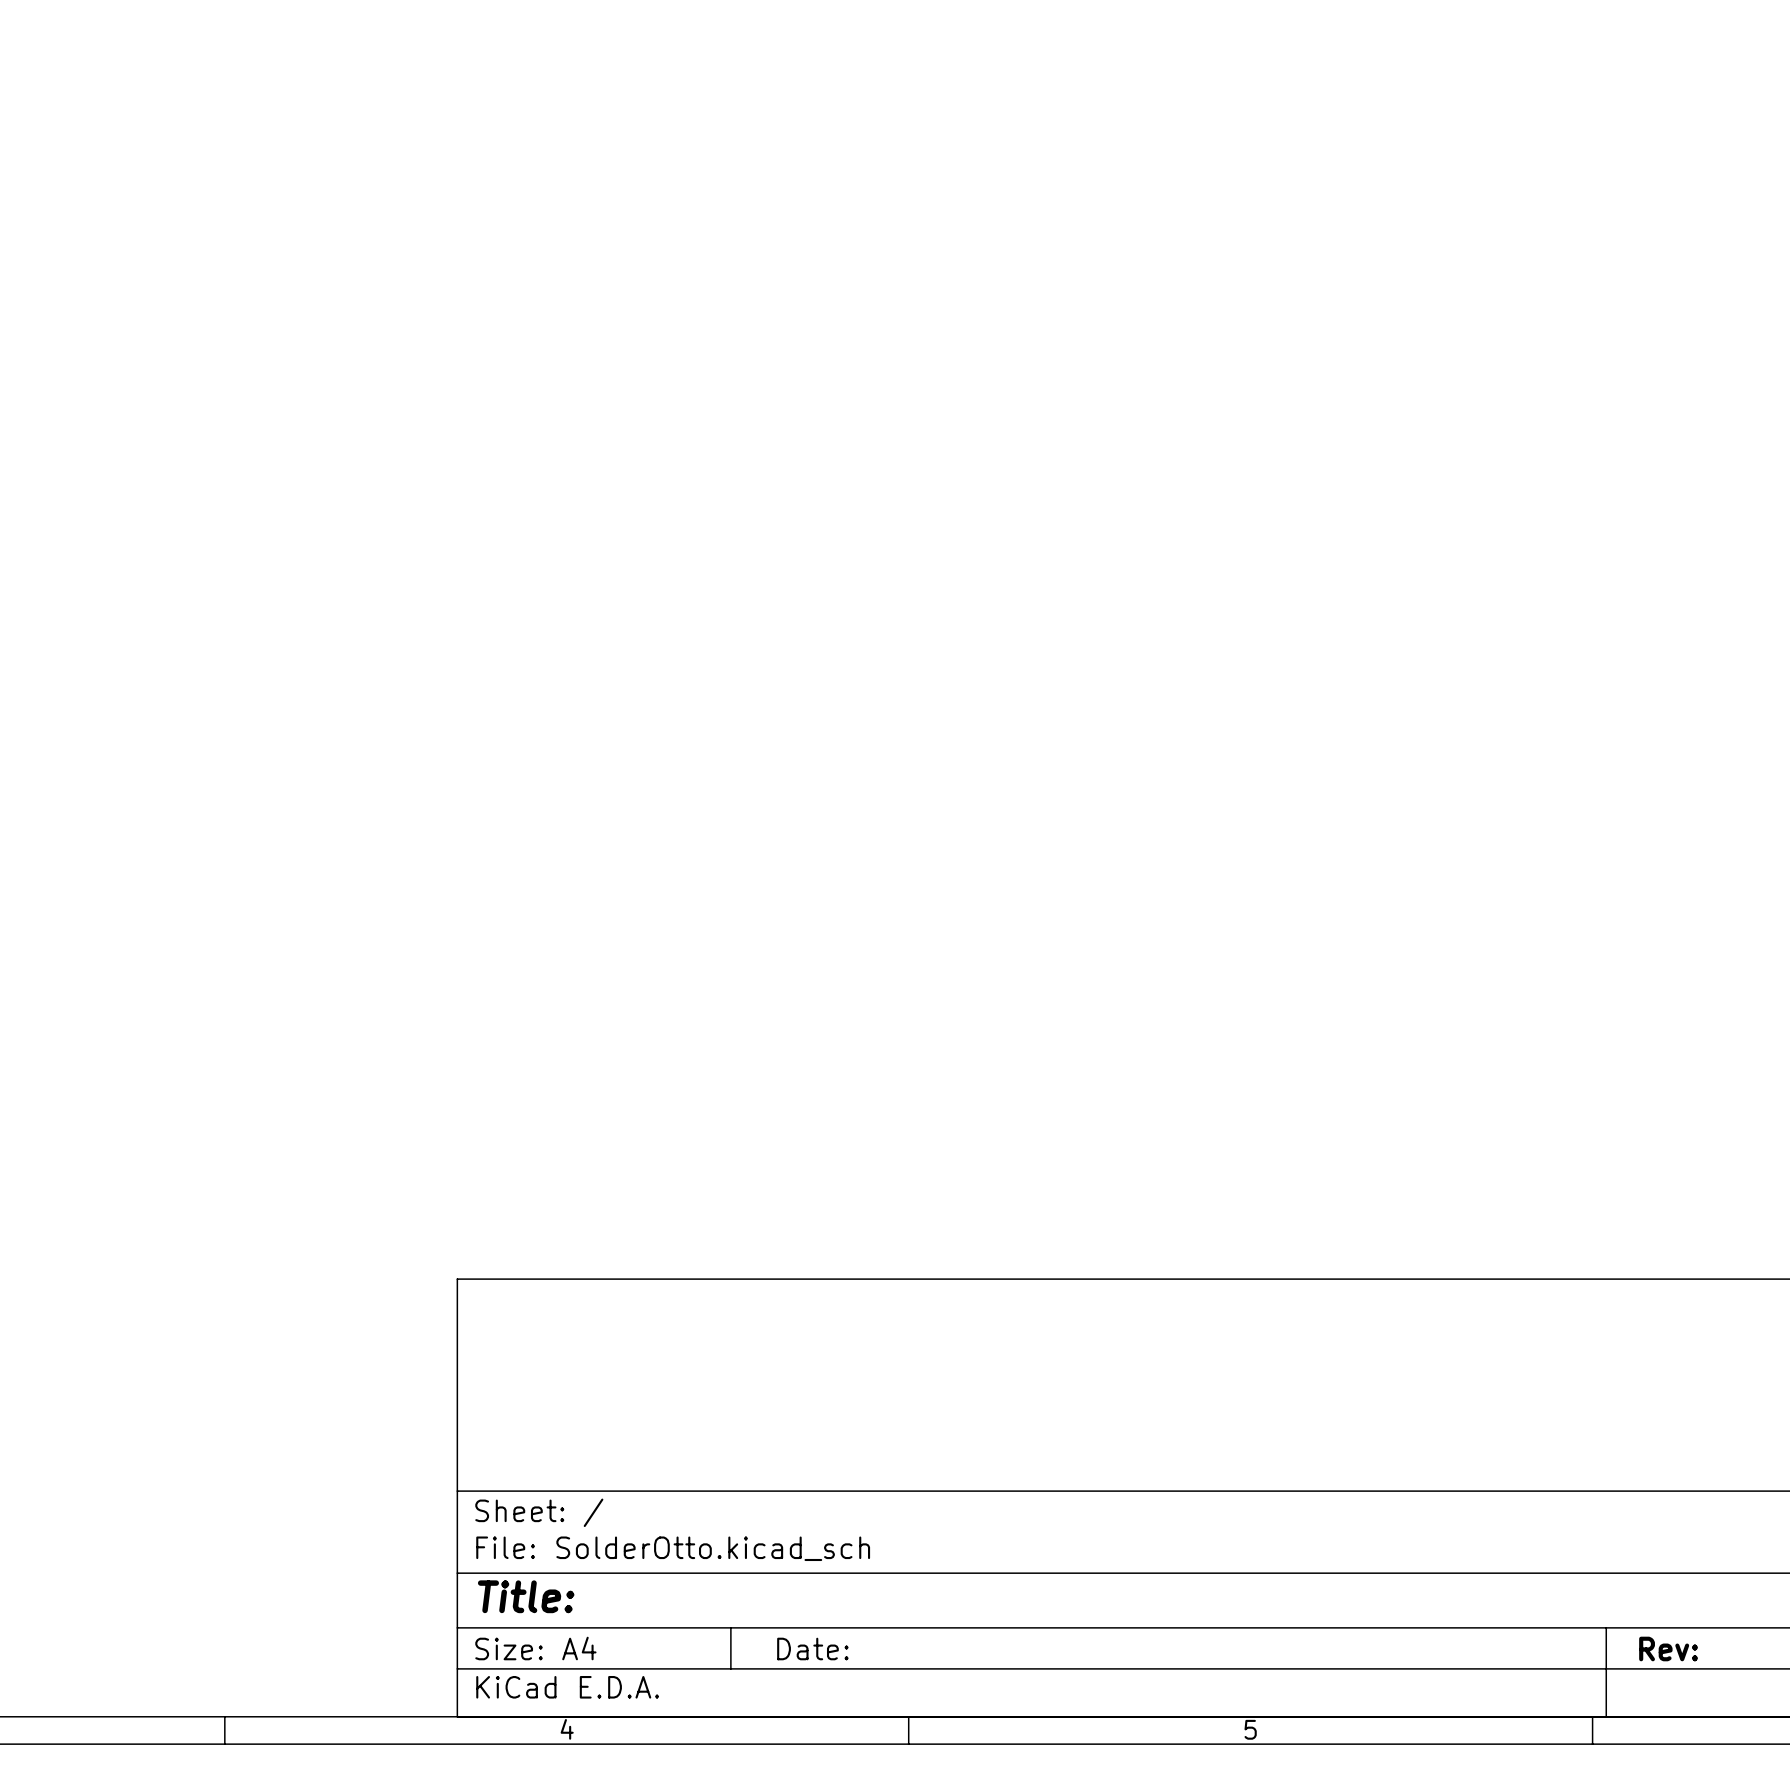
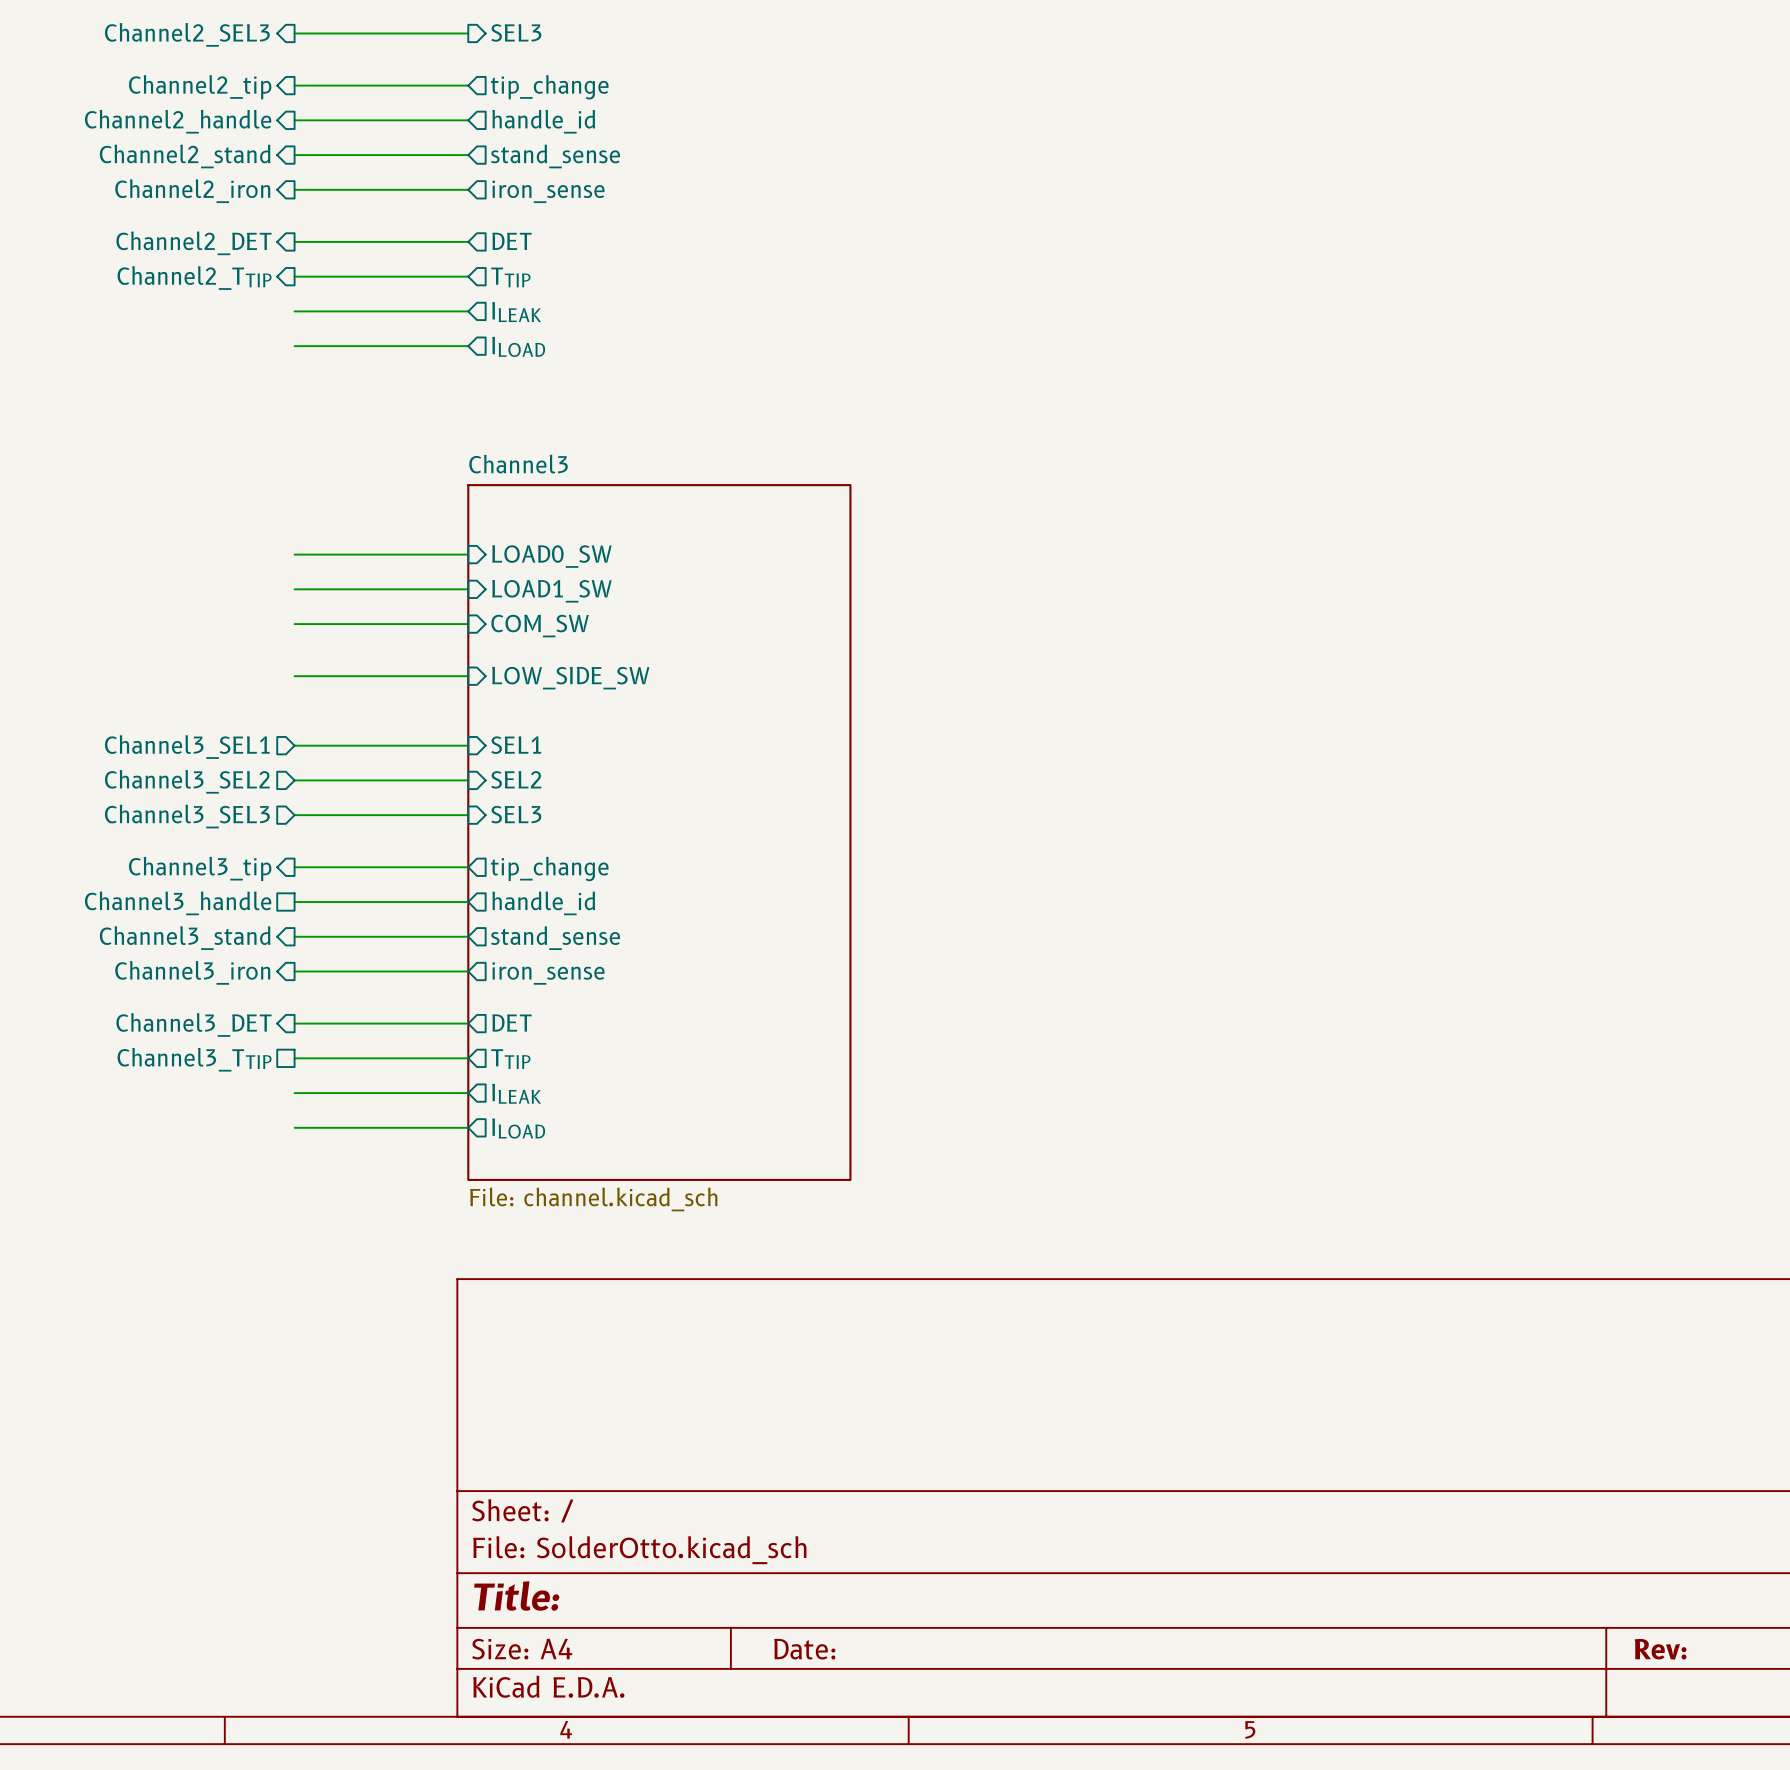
sheet pin: none -> SEL3 (516, 32)
sheet pin: none -> Channel2_SEL3 (187, 34)
wire: none -> (294, 33) (468, 33)
wire: none -> (294, 85) (468, 85)
sheet pin: none -> Channel2_tip (200, 87)
sheet pin: none -> tip_change (549, 87)
sheet pin: none -> Channel2_handle (178, 121)
wire: none -> (294, 120) (468, 120)
sheet pin: none -> handle_id (543, 121)
sheet pin: none -> Channel2_stand (185, 156)
wire: none -> (294, 155) (468, 155)
sheet pin: none -> stand_sense (555, 156)
sheet pin: none -> Channel2_iron (192, 191)
wire: none -> (294, 189) (468, 189)
sheet pin: none -> iron_sense (548, 191)
wire: none -> (294, 241) (468, 241)
sheet pin: none -> DET (511, 241)
sheet pin: none -> Channel2_DET (193, 243)
wire: none -> (294, 276) (468, 276)
sheet pin: none -> Channel2_TTIP (194, 278)
sheet pin: none -> TTIP (510, 277)
wire: none -> (294, 311) (468, 311)
sheet pin: none -> ILEAK (516, 312)
wire: none -> (294, 346) (468, 346)
sheet pin: none -> ILOAD (518, 346)
wire: none -> (294, 554) (468, 554)
sheet pin: none -> LOAD0_SW (551, 556)
wire: none -> (294, 589) (468, 589)
sheet pin: none -> LOAD1_SW (551, 591)
wire: none -> (294, 624) (468, 624)
sheet pin: none -> COM_SW (540, 626)
wire: none -> (294, 676) (468, 676)
sheet pin: none -> LOW_SIDE_SW (570, 678)
sheet pin: none -> Channel3_SEL1 (187, 747)
wire: none -> (294, 745) (468, 745)
sheet pin: none -> SEL1 (516, 745)
sheet pin: none -> SEL2 (516, 779)
sheet pin: none -> Channel3_SEL2 (187, 781)
wire: none -> (294, 780) (468, 780)
sheet pin: none -> SEL3 (516, 814)
sheet pin: none -> Channel3_SEL3 (187, 816)
wire: none -> (294, 815) (468, 815)
sheet Channel3: none -> File: channel.kicad_sch (659, 832)
wire: none -> (294, 867) (468, 867)
sheet pin: none -> Channel3_tip (200, 868)
sheet pin: none -> tip_change (549, 869)
sheet pin: none -> Channel3_handle (178, 903)
wire: none -> (294, 902) (468, 902)
sheet pin: none -> handle_id (543, 903)
sheet pin: none -> Channel3_stand (185, 938)
wire: none -> (294, 936) (468, 936)
sheet pin: none -> stand_sense (555, 938)
sheet pin: none -> Channel3_iron (192, 972)
wire: none -> (294, 971) (468, 971)
sheet pin: none -> iron_sense (548, 973)
sheet pin: none -> DET (511, 1023)
sheet pin: none -> Channel3_DET (193, 1024)
wire: none -> (294, 1023) (468, 1023)
wire: none -> (294, 1058) (468, 1058)
sheet pin: none -> Channel3_TTIP (194, 1059)
sheet pin: none -> TTIP (510, 1059)
wire: none -> (294, 1093) (468, 1093)
sheet pin: none -> ILEAK (516, 1093)
wire: none -> (294, 1127) (468, 1127)
sheet pin: none -> ILOAD (518, 1128)

